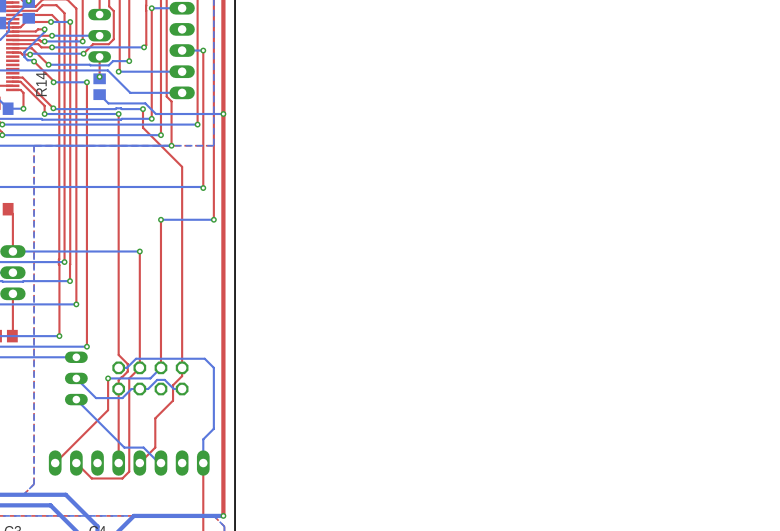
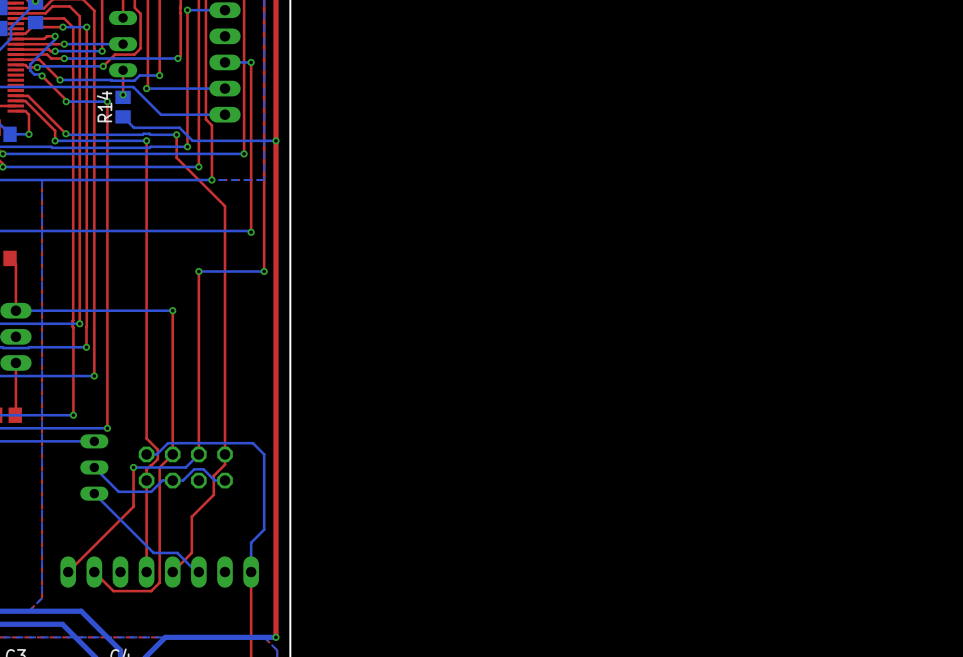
R14 name position: R14 (41, 84) -> R14 (104, 106)

